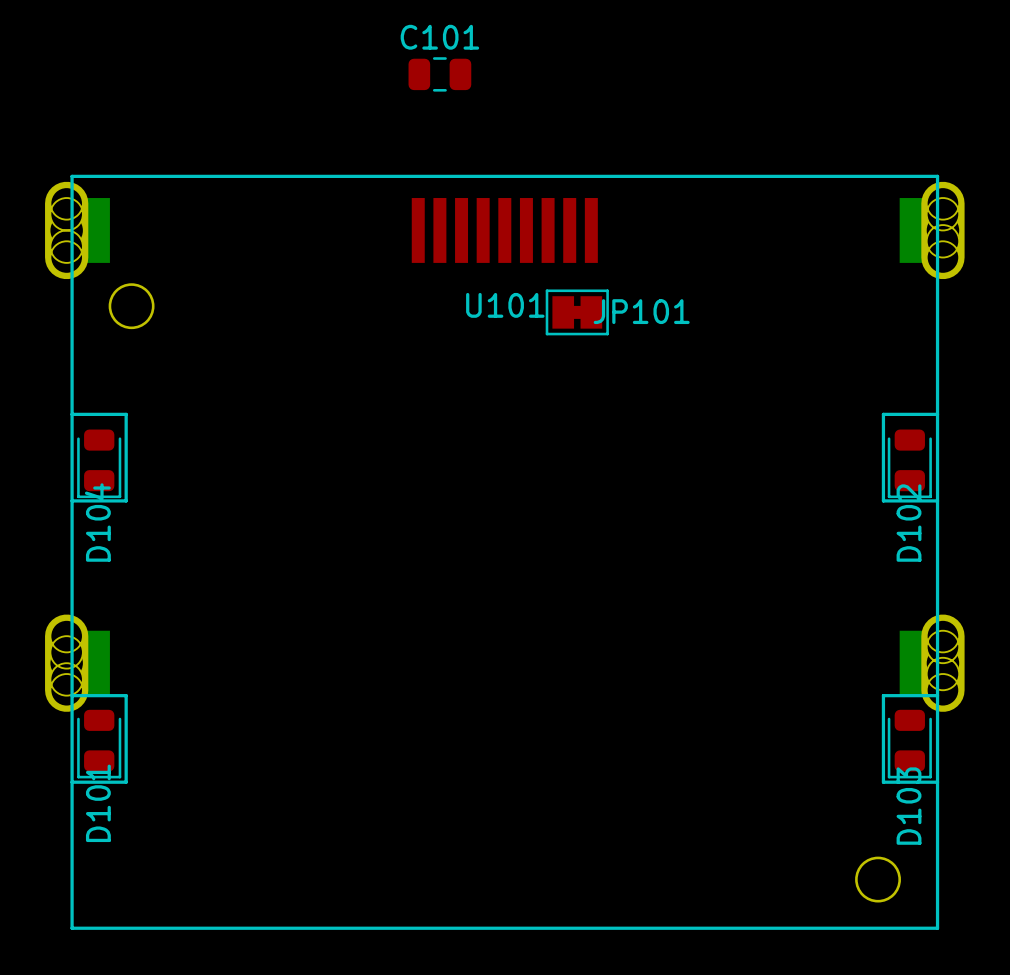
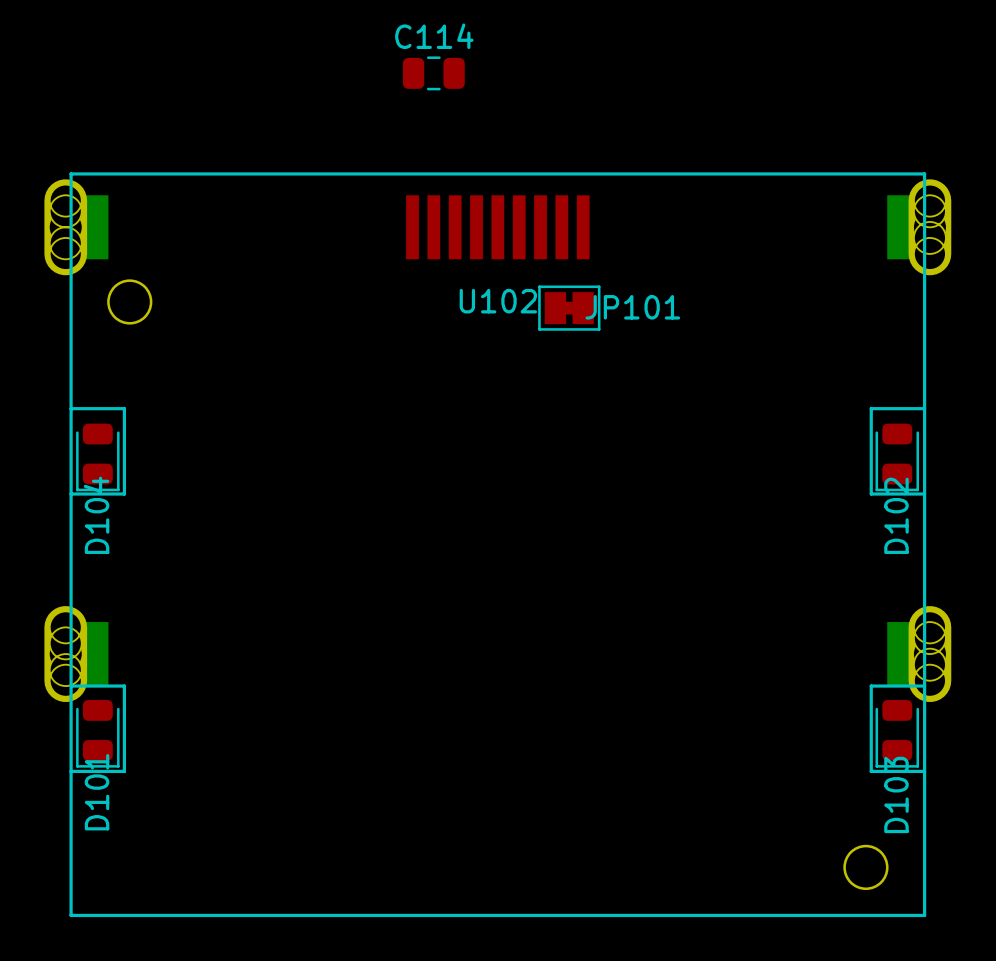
C101 name: C101 (439, 37) -> C114 (434, 36)
U101 name: U101 (505, 305) -> U102 (498, 301)

